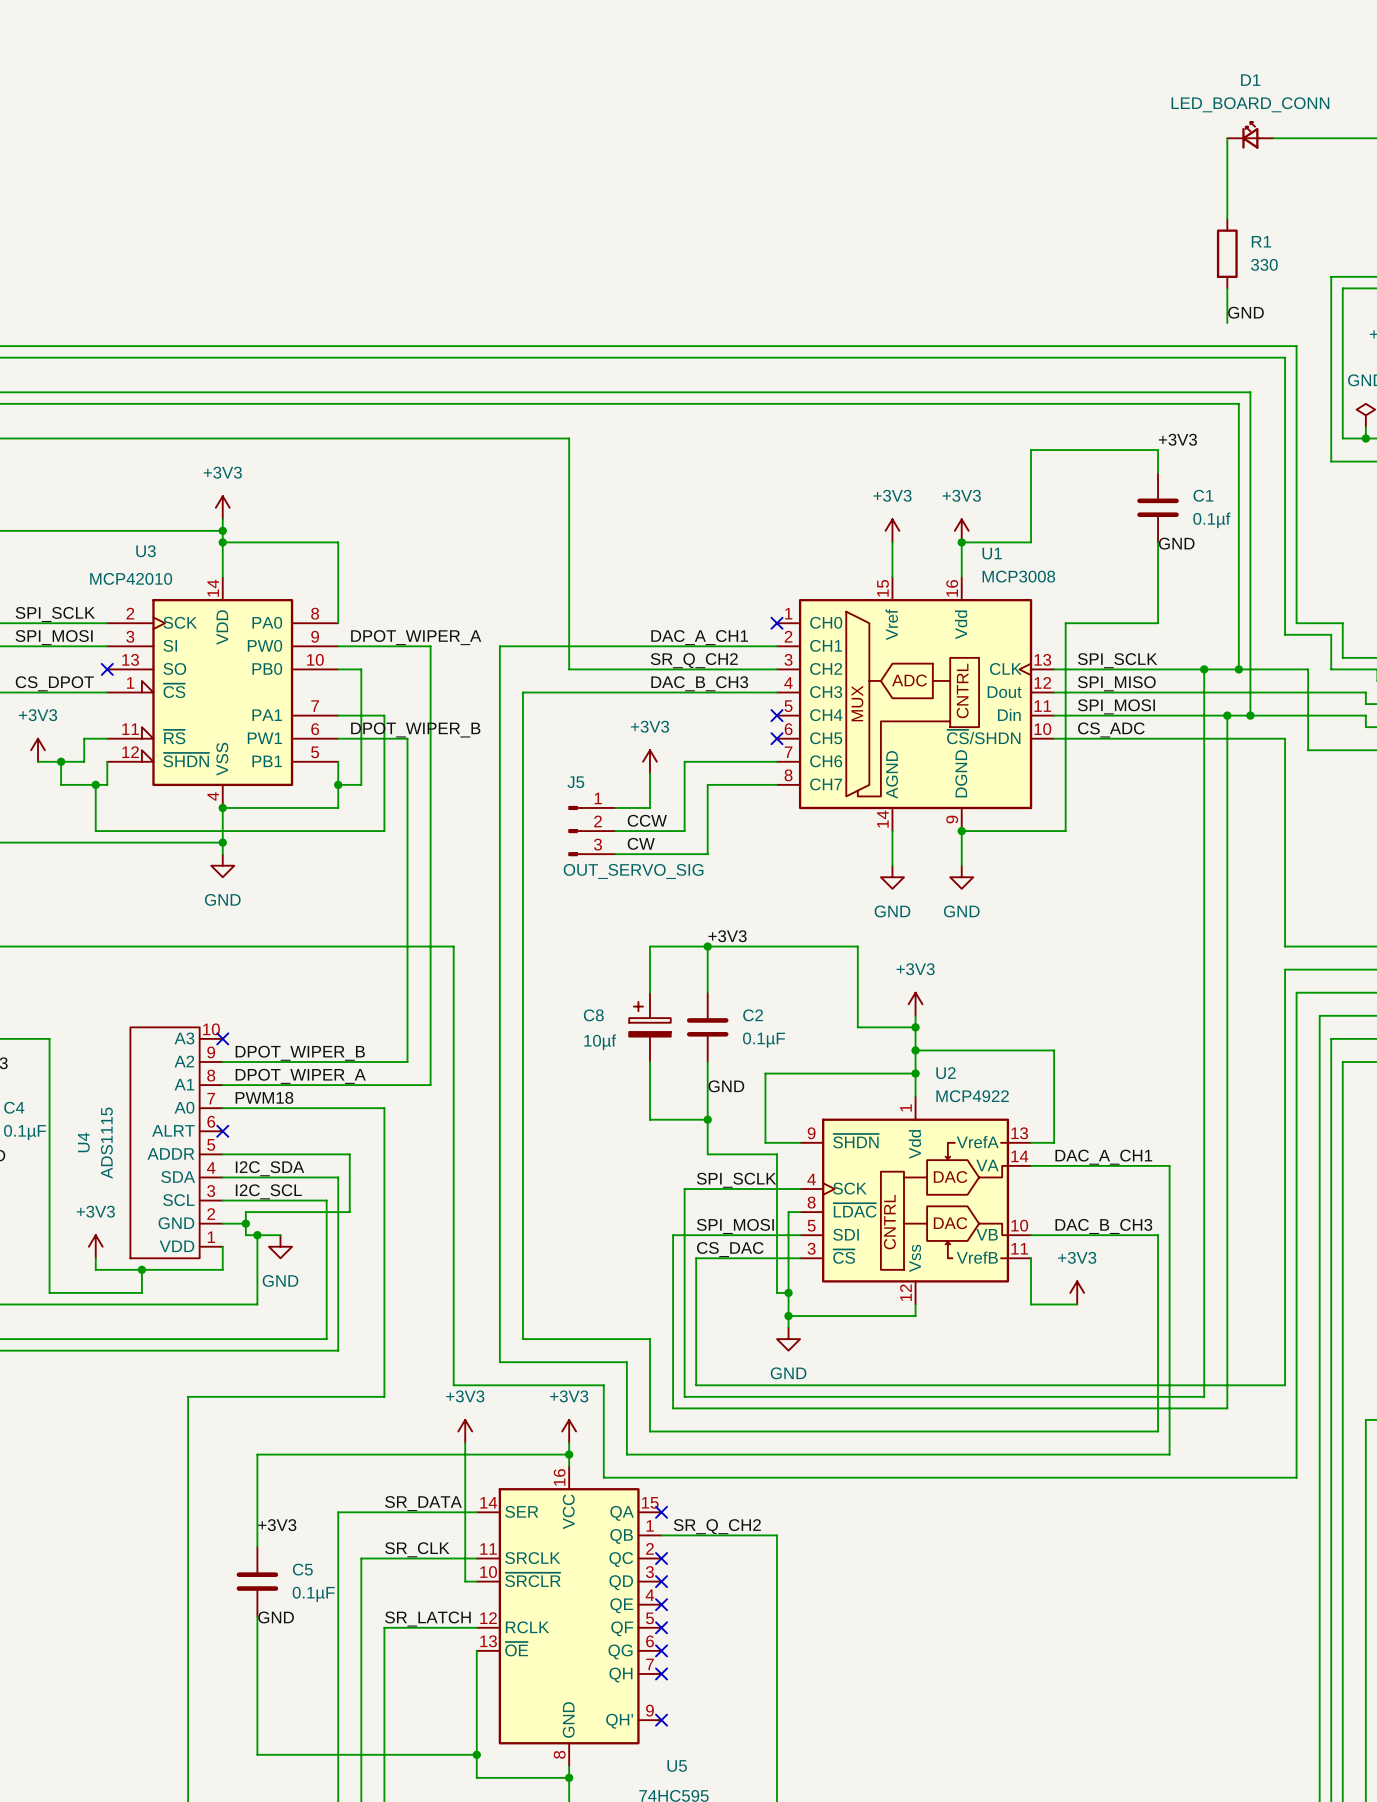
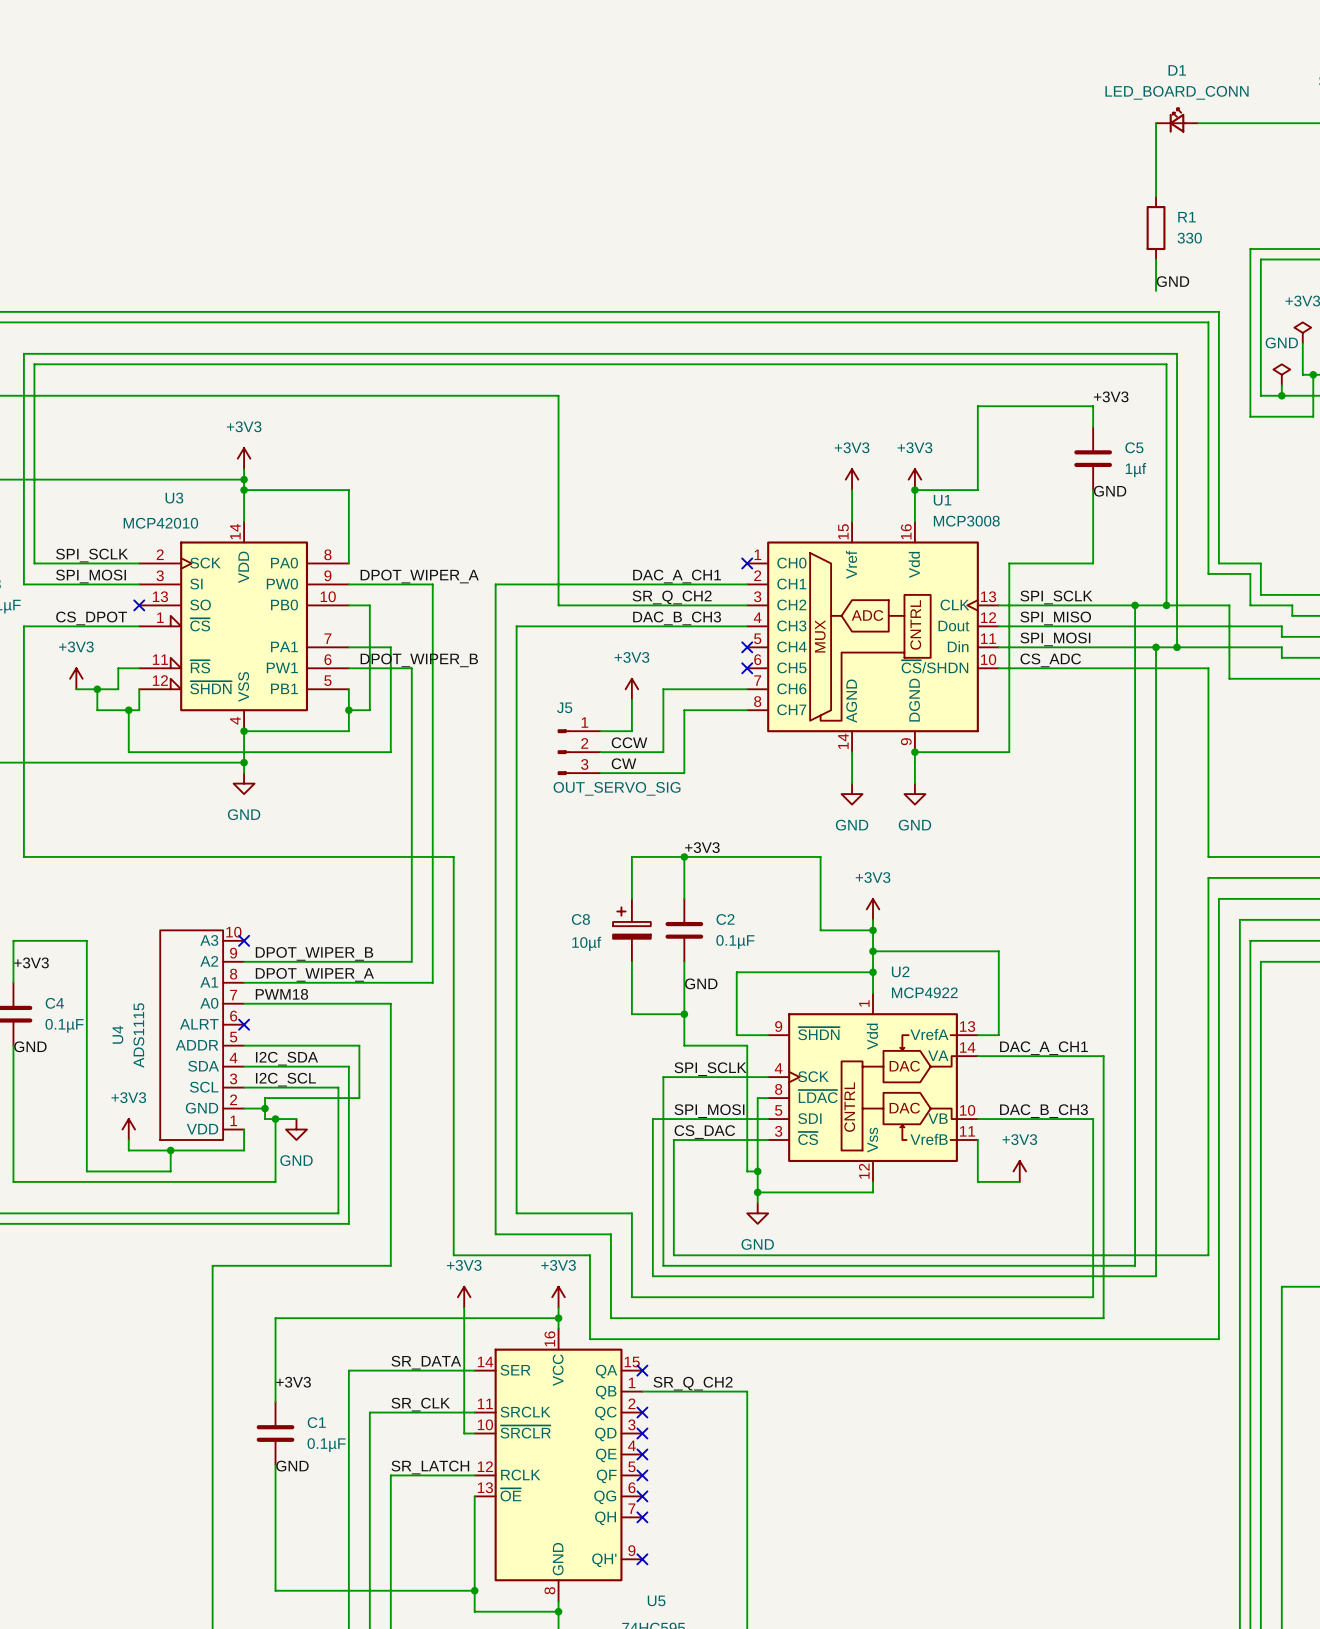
C1 name: C1 (1203, 495) -> C5 (1134, 447)
C1 value: 0.1µf (1211, 520) -> 1µf (1135, 470)
C5 name: C5 (302, 1569) -> C1 (316, 1422)

